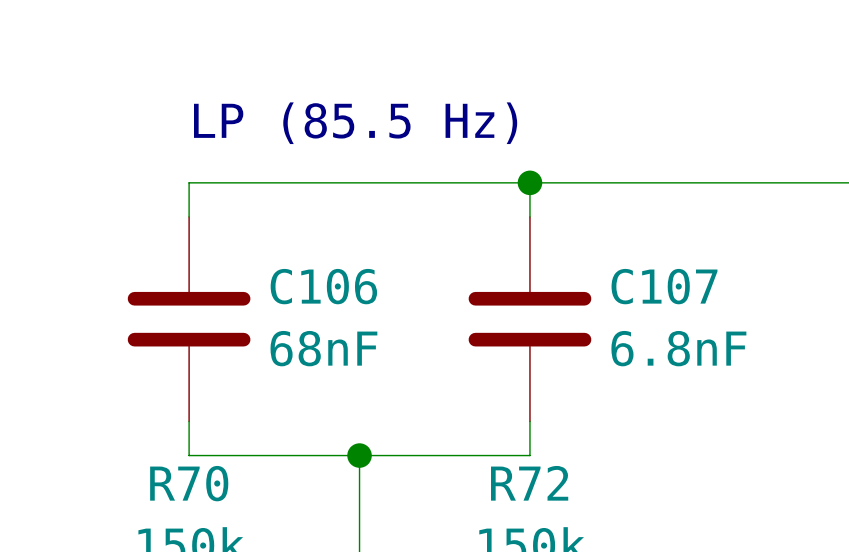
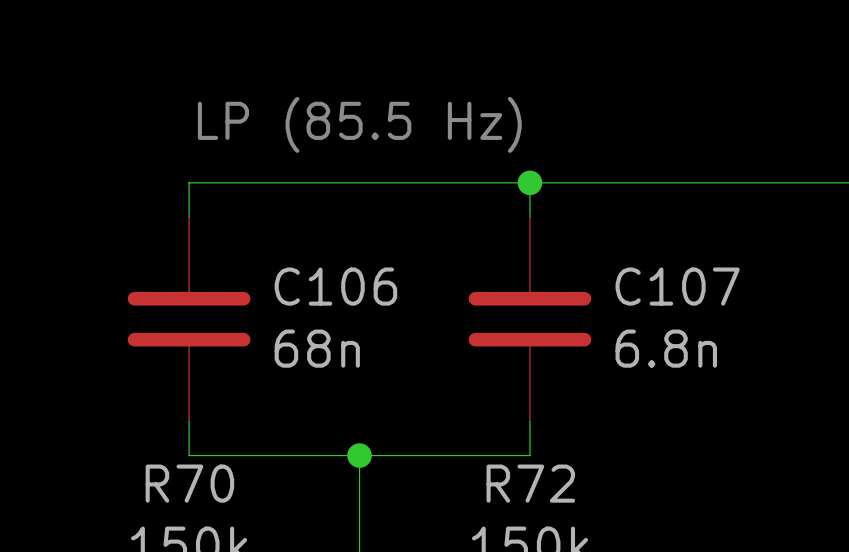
C106 value: 68nF (323, 348) -> 68n (317, 348)
C107 value: 6.8nF (678, 348) -> 6.8n (666, 348)

